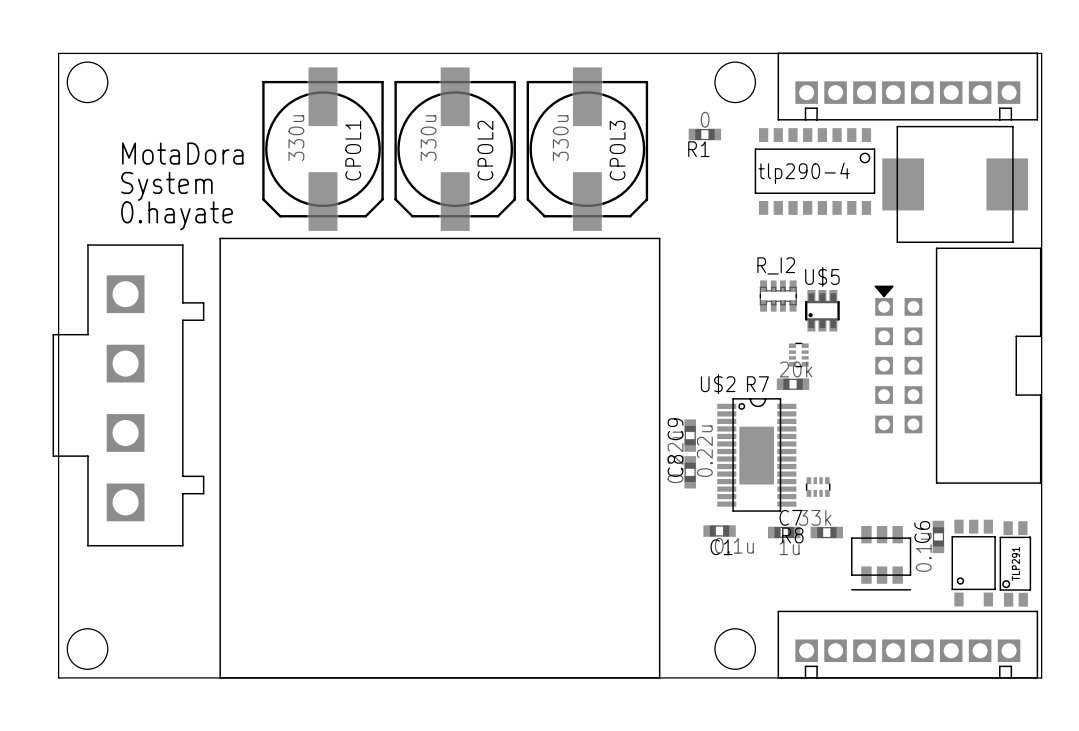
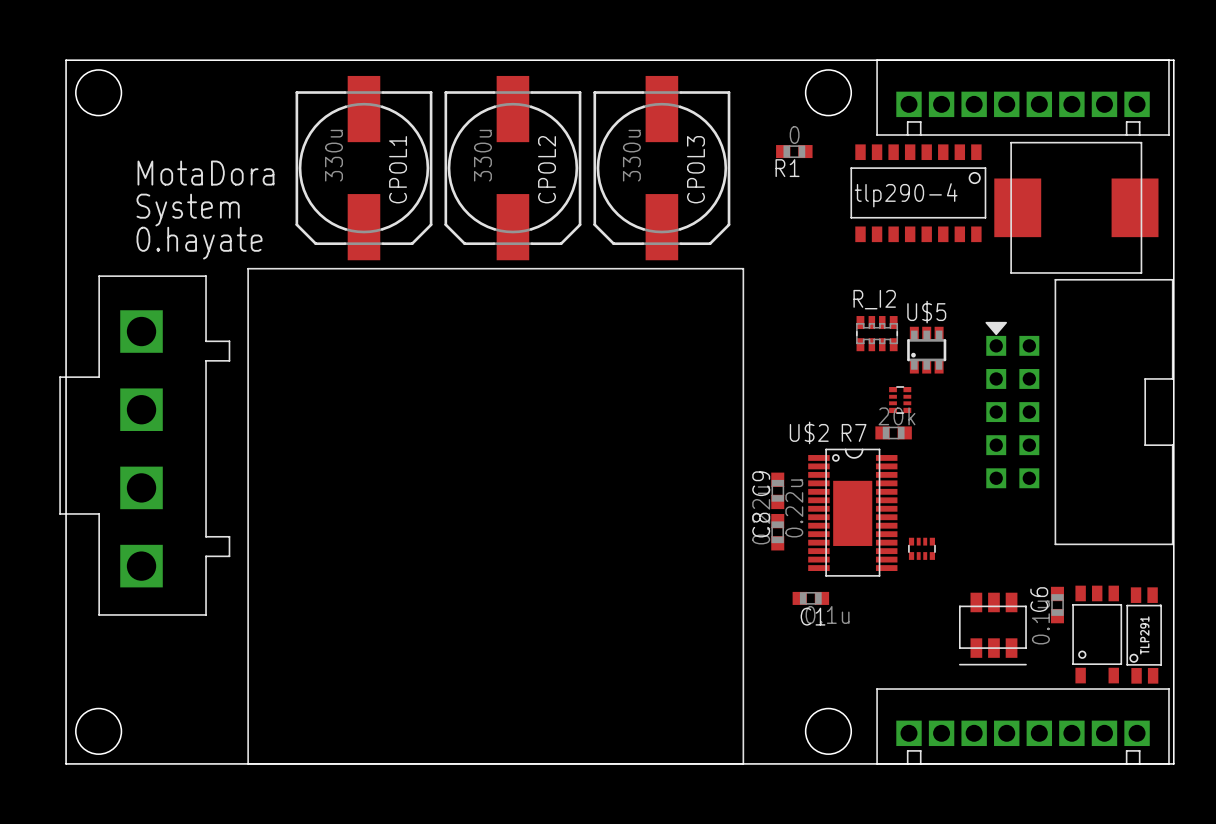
C7: 1u (784, 532) -> none
R8: 33k (826, 532) -> none

